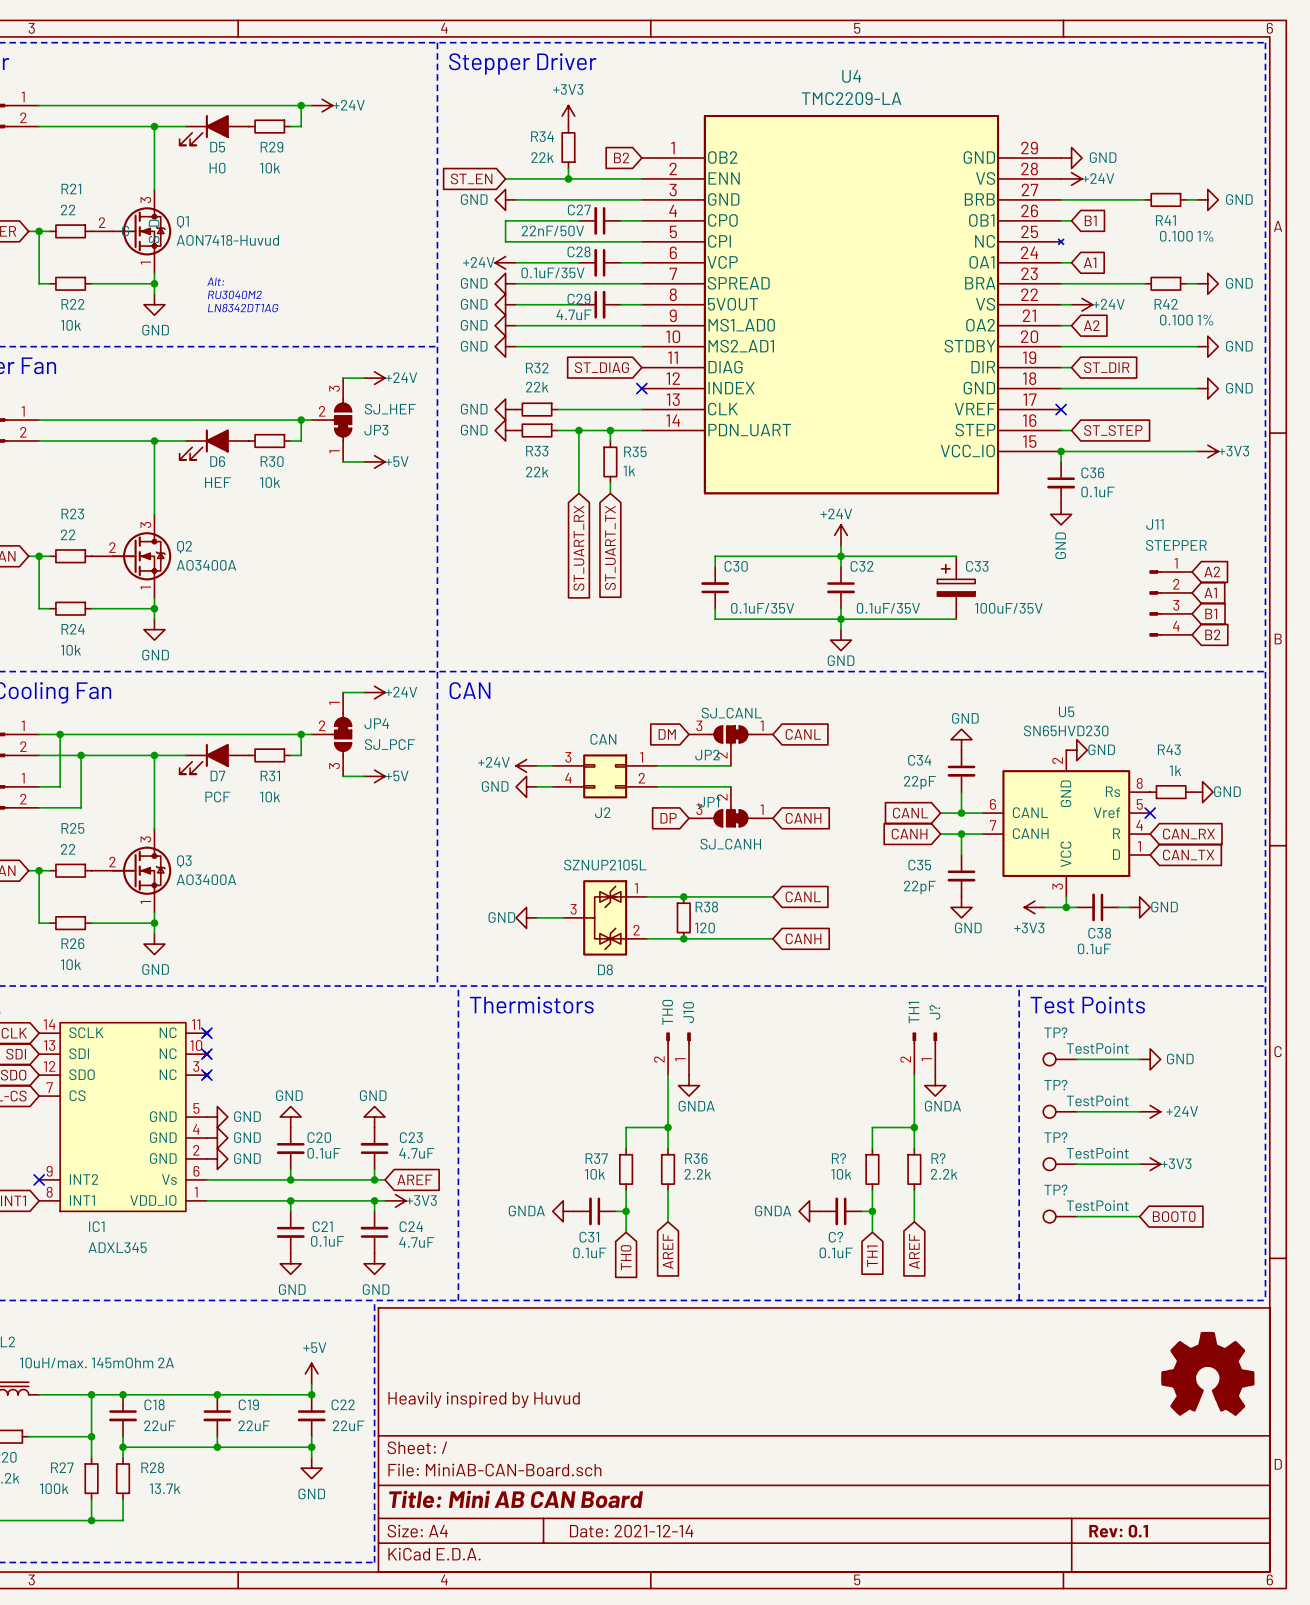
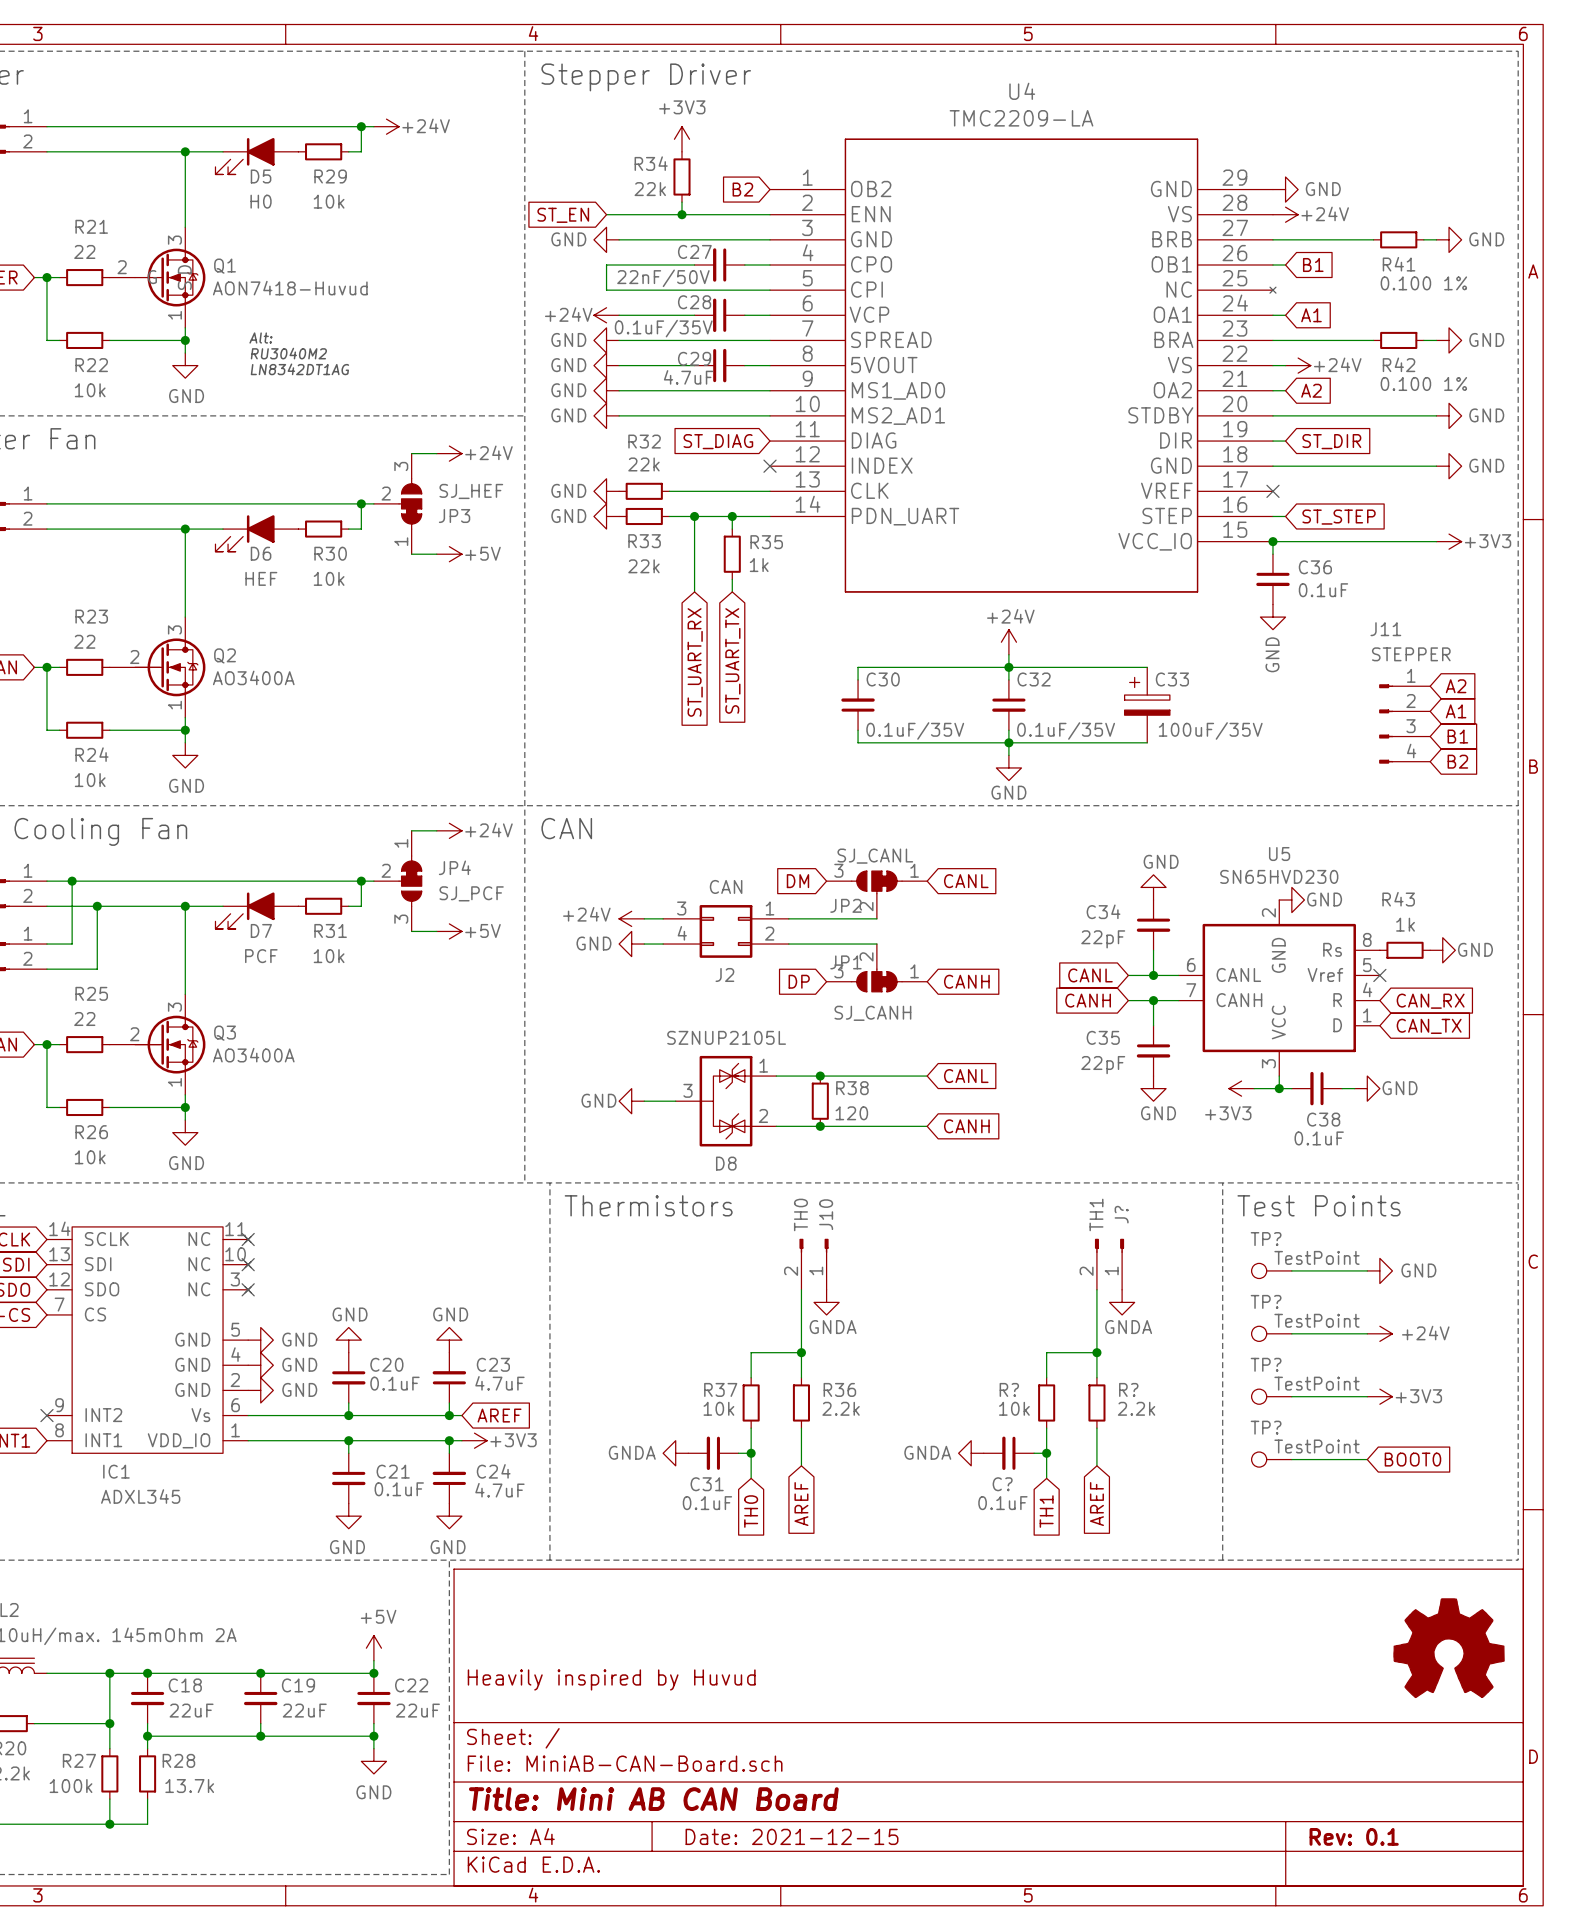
title block: Date: 2021-12-14 (631, 1531) -> Date: 2021-12-15 (792, 1836)

